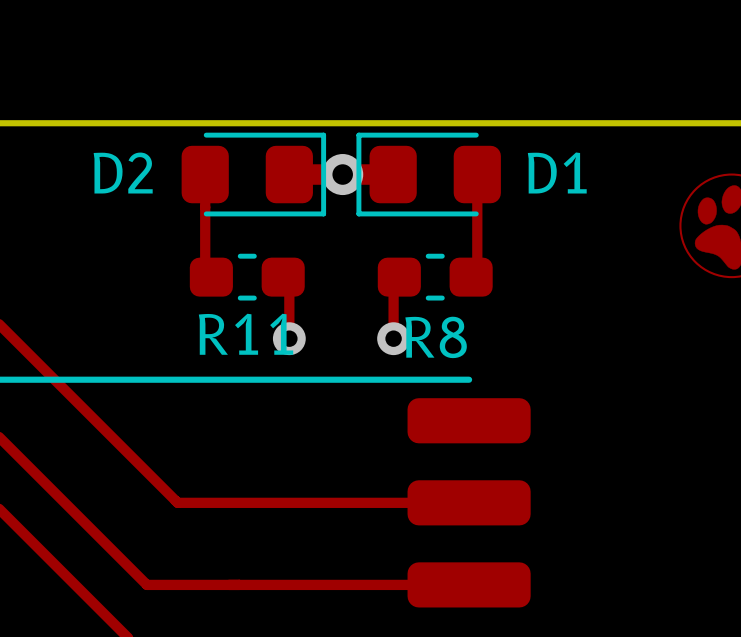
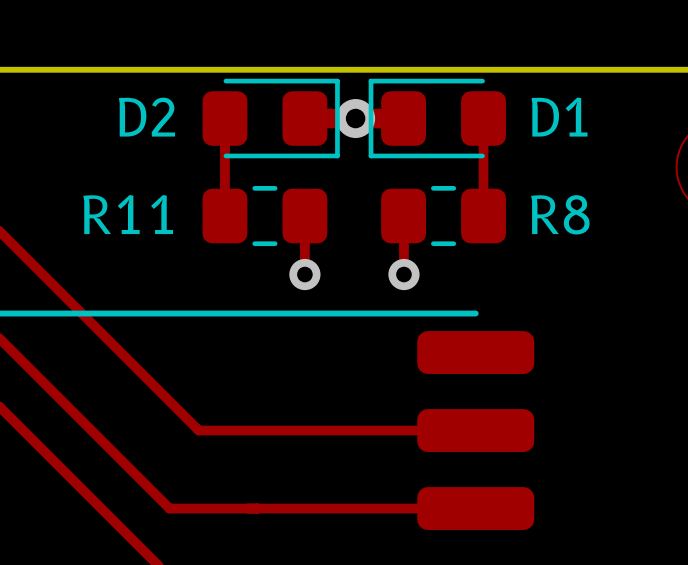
R11 footprint: [189, 253, 305, 301] -> [202, 185, 328, 247]
R8 footprint: [377, 253, 493, 301] -> [381, 185, 506, 247]
R11 name position: R11 (246, 334) -> R11 (128, 214)
R8 name position: R8 (436, 337) -> R8 (560, 214)

